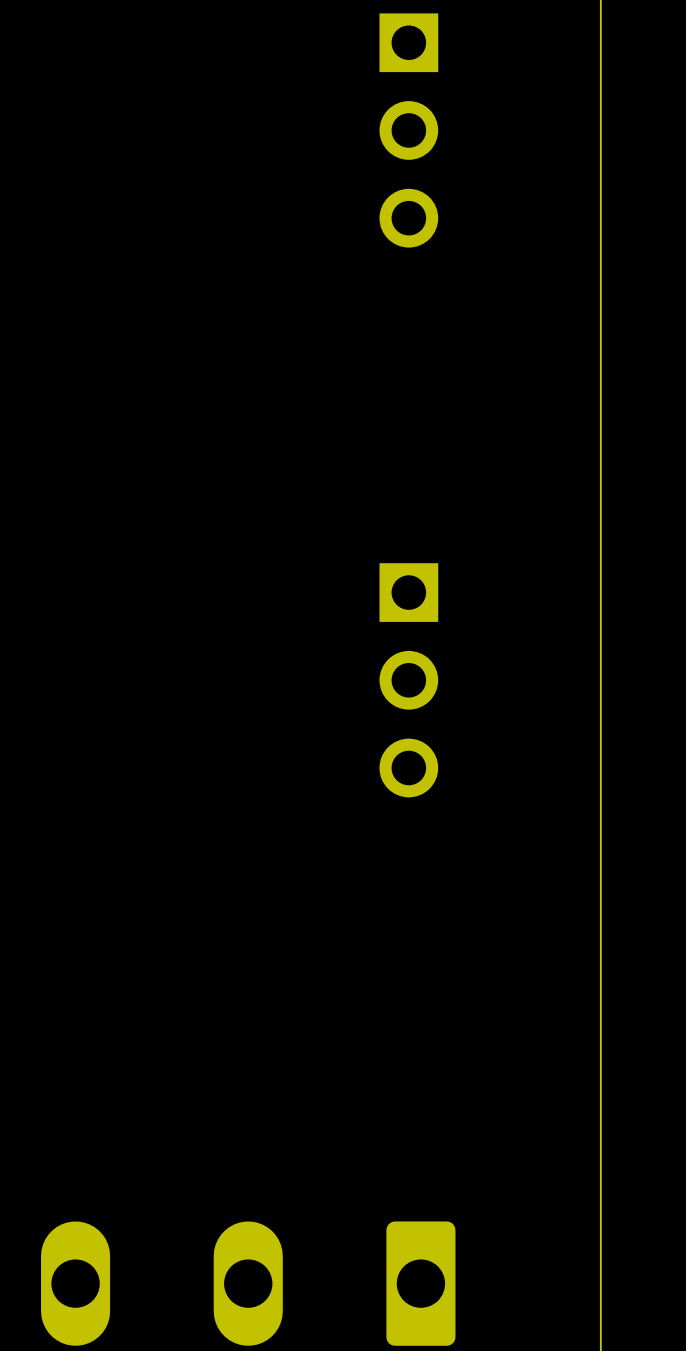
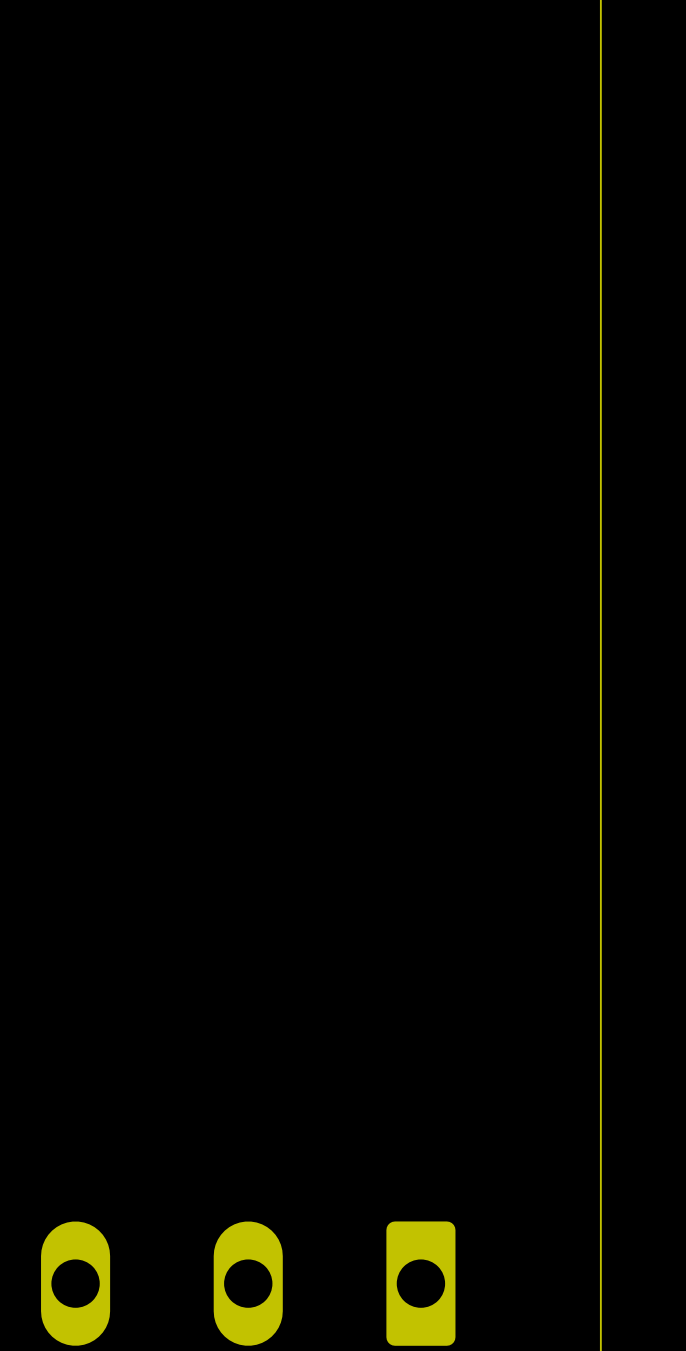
part: (408, 130) -> none
part: (408, 680) -> none

